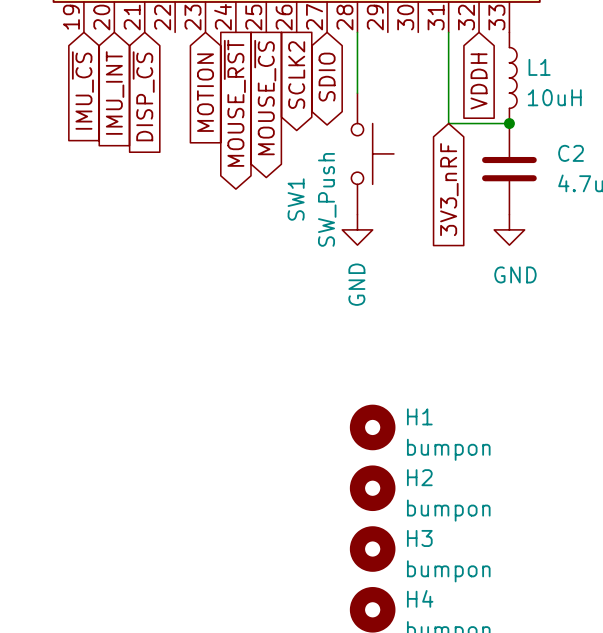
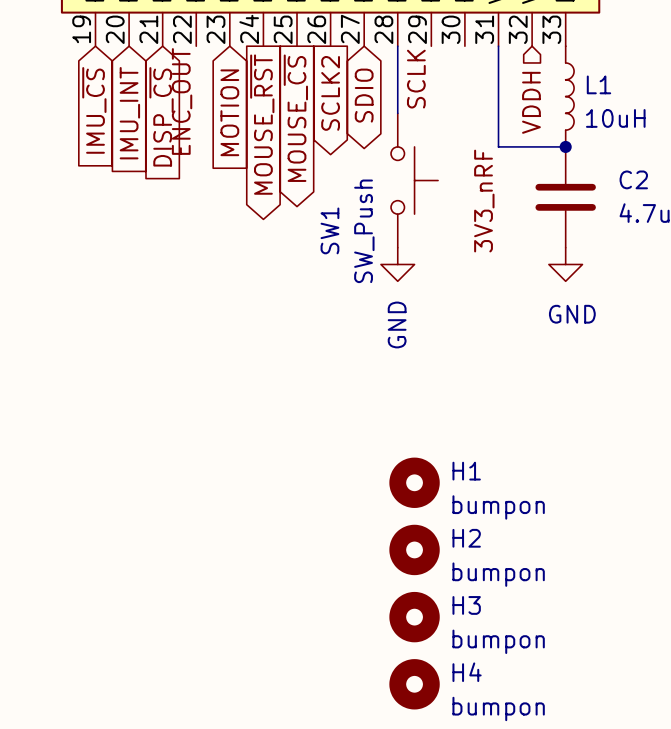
label: none -> SCLK (416, 79)
global label: VDDH (479, 81) -> none
label: none -> ENC_OUT (182, 101)
hierarchical label: none -> VDDH (531, 102)
label: none -> 3V3_nRF (484, 201)
global label: 3V3_nRF (449, 189) -> none

